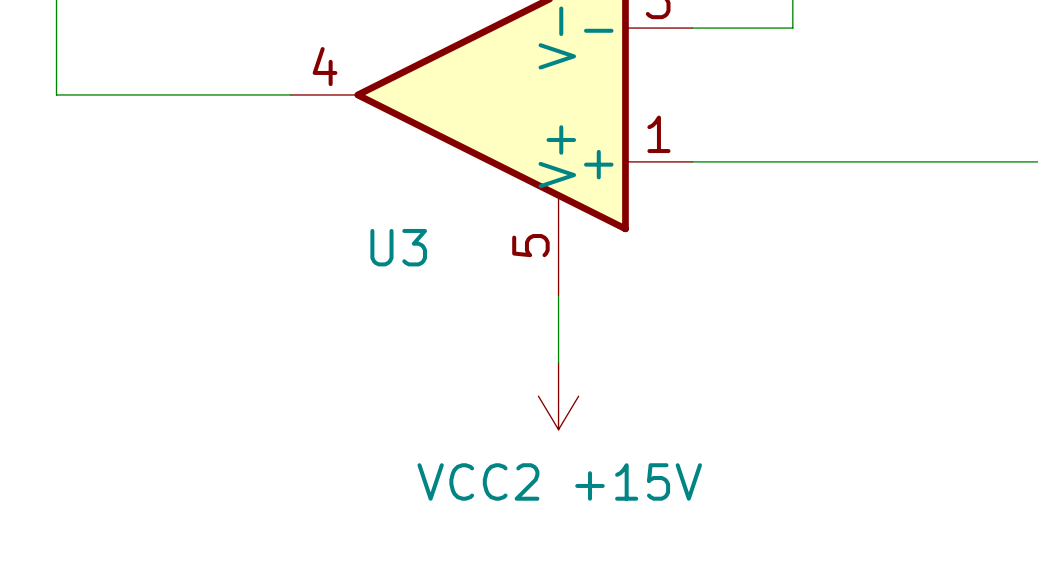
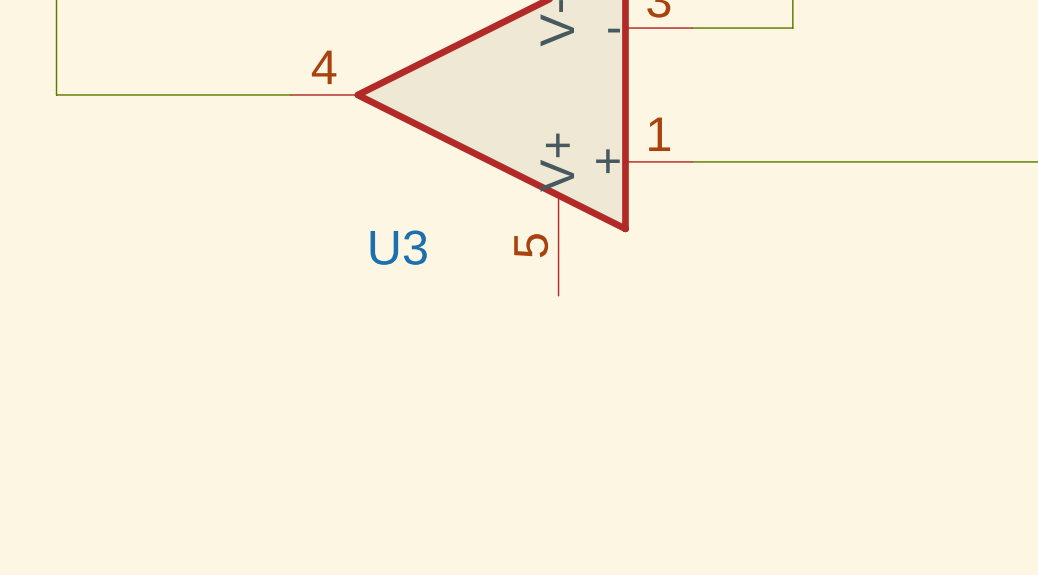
wire: (558, 295) (558, 362) -> none
power symbol: VCC2 +15V (558, 396) -> none

